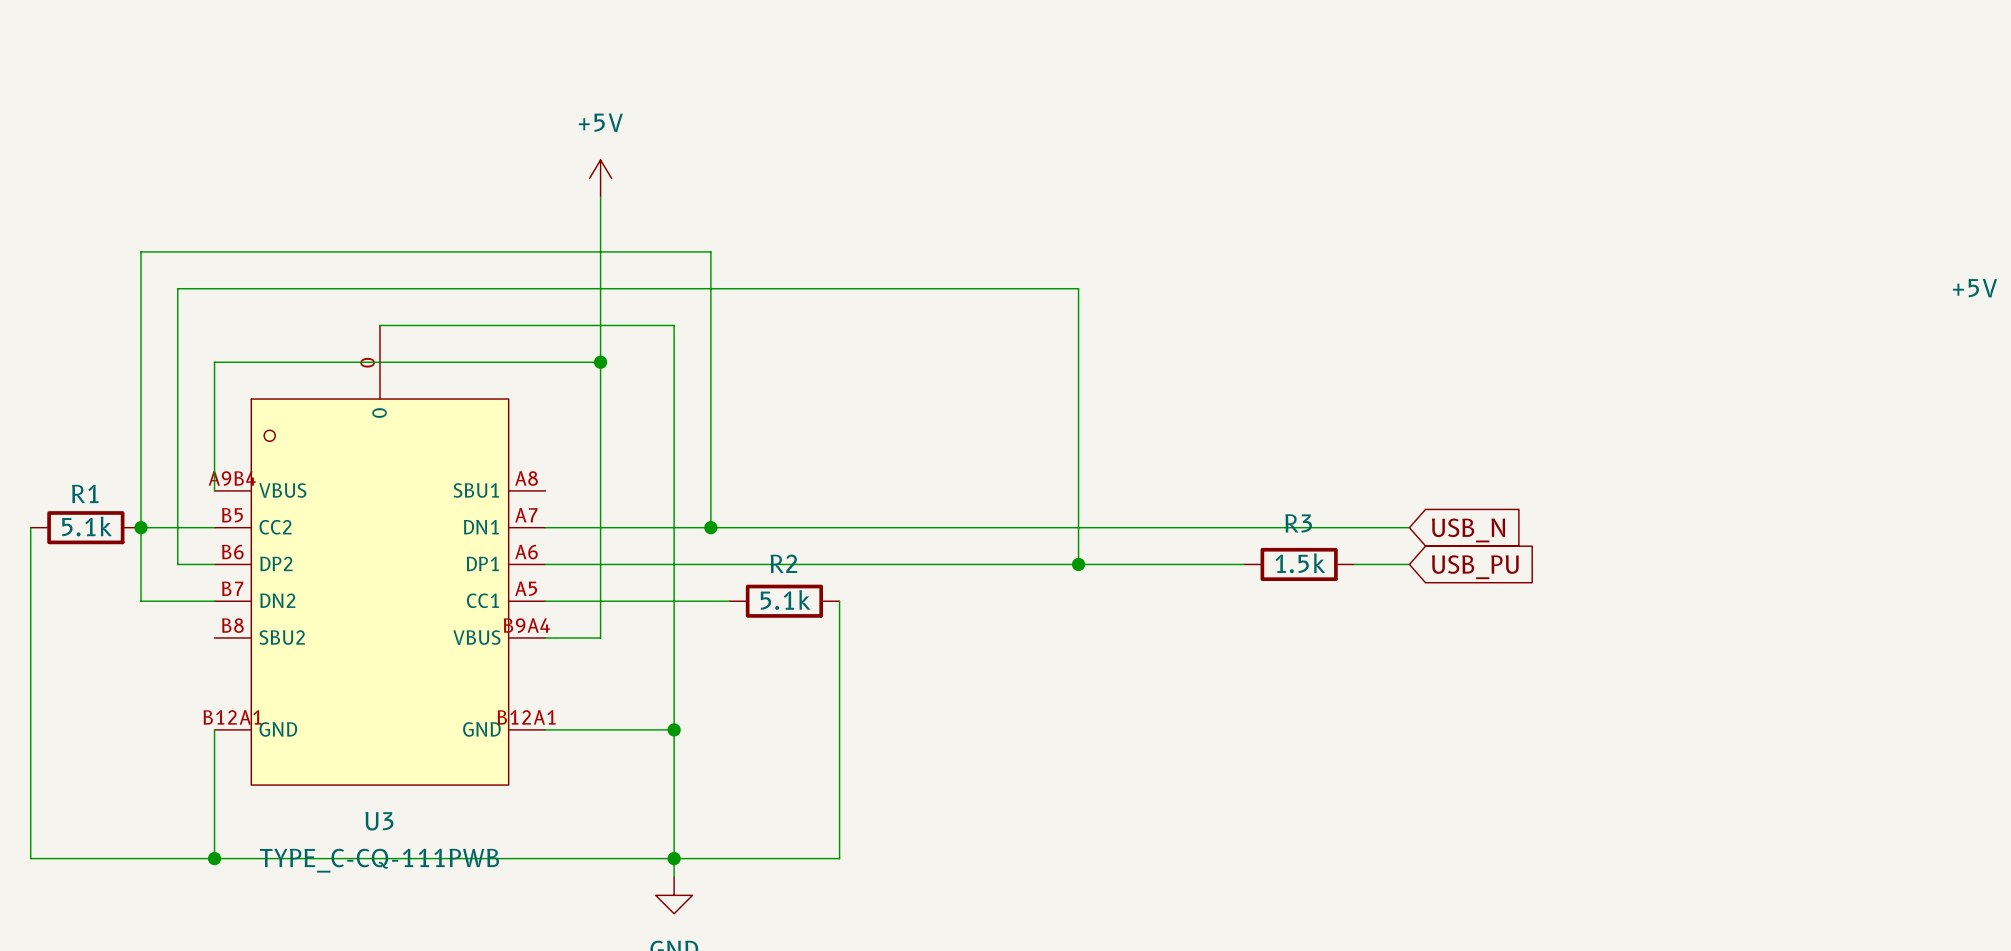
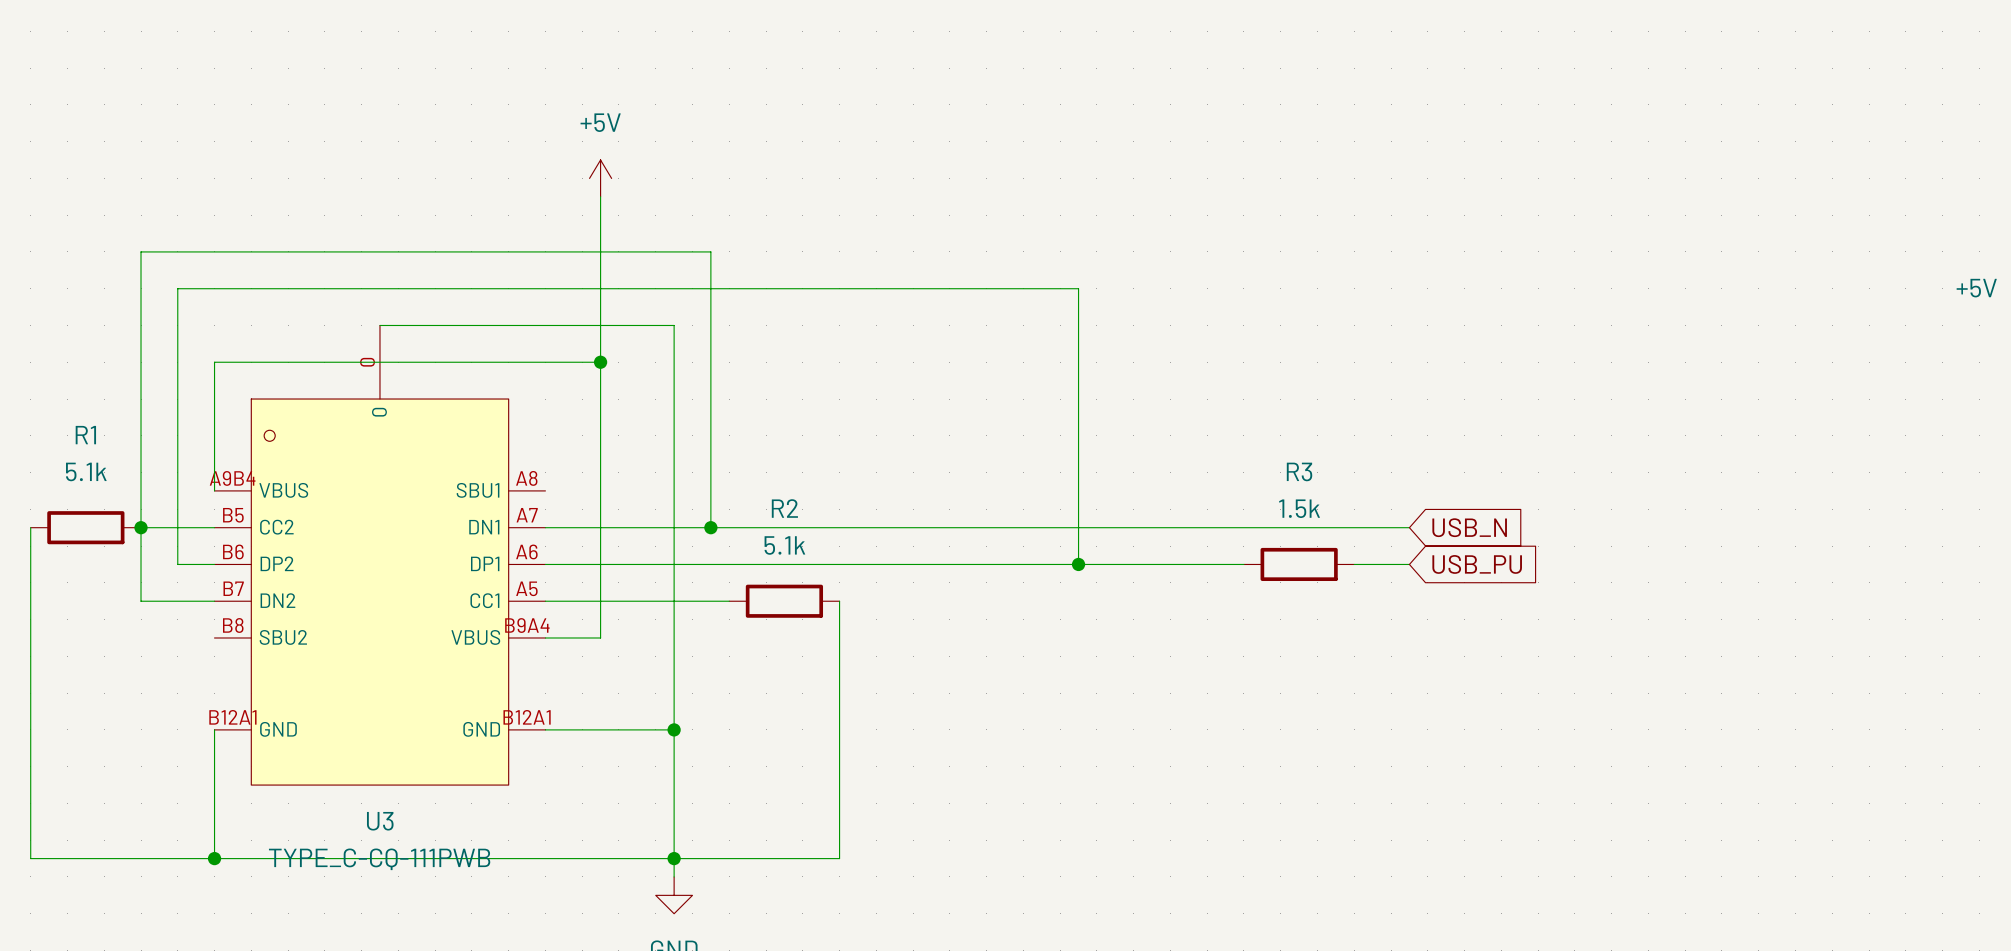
R1 name position: R1 (85, 493) -> R1 (85, 435)
R3 name position: R3 (1298, 523) -> R3 (1299, 471)
R1 value position: 5.1k (87, 526) -> 5.1k (86, 471)
R2 name position: R2 (783, 563) -> R2 (784, 508)
R3 value position: 1.5k (1300, 563) -> 1.5k (1299, 508)
R2 value position: 5.1k (785, 600) -> 5.1k (784, 545)

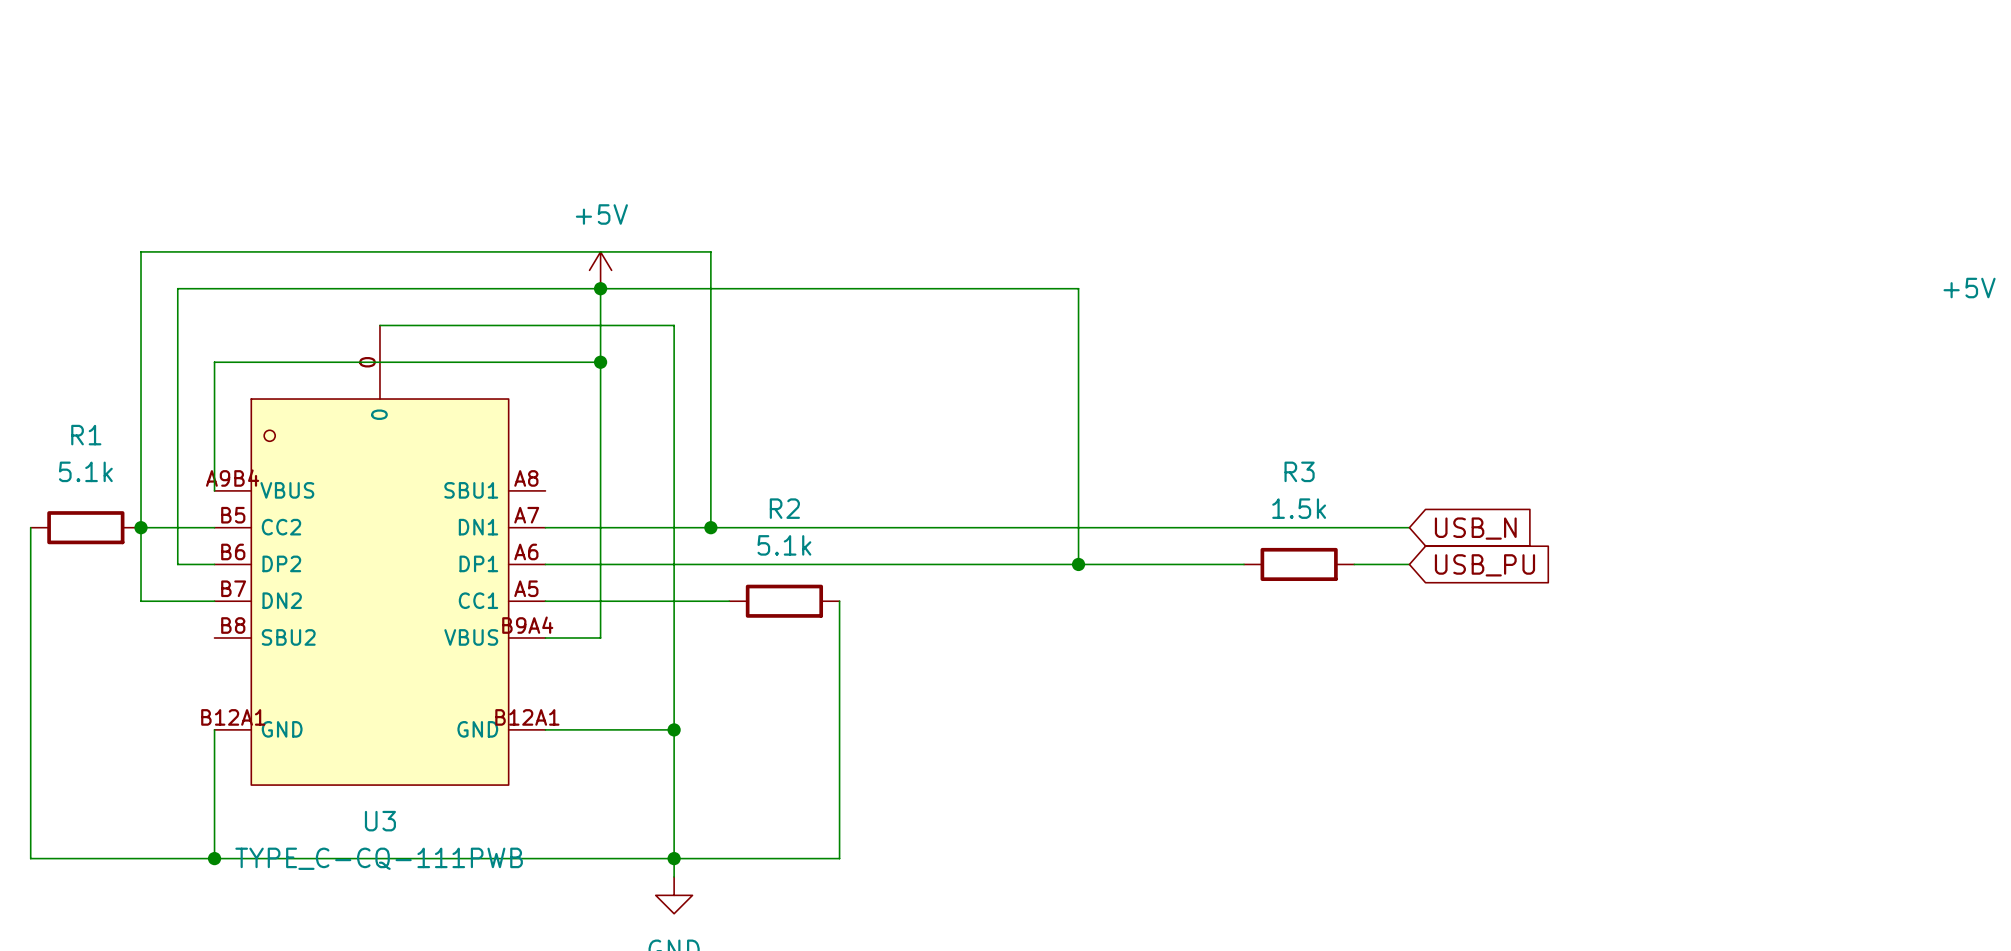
power symbol position: +5V (600, 178) -> +5V (600, 270)
wire: (600, 196) (600, 288) -> none
junction: none -> (600, 288)

